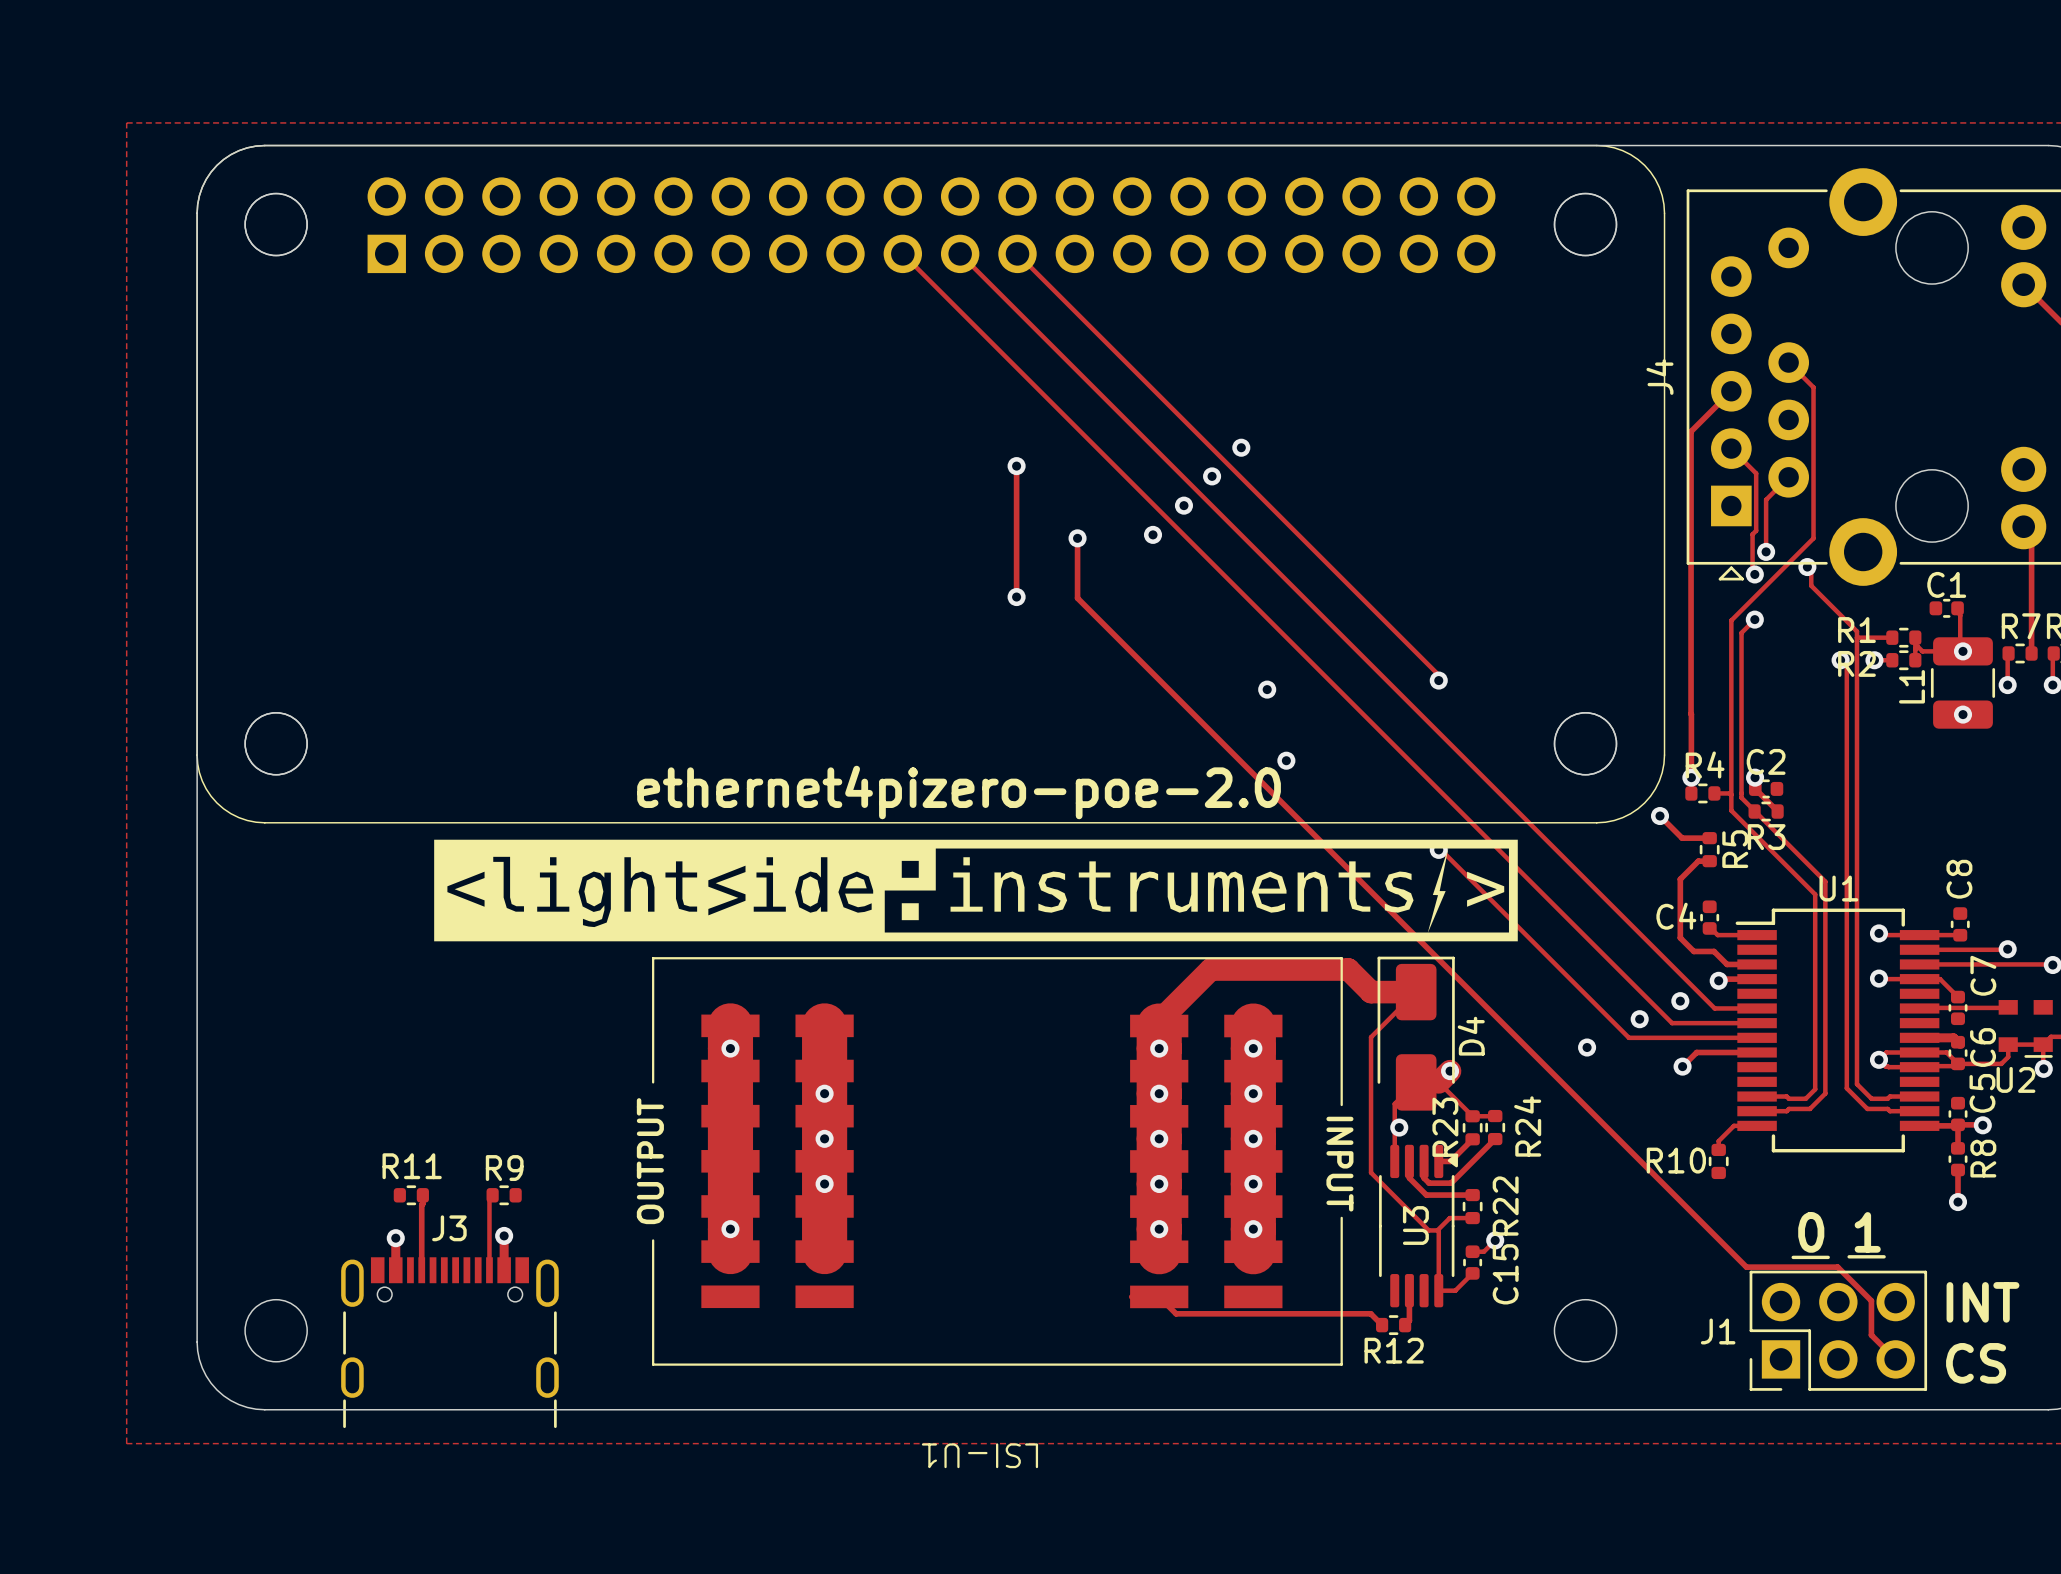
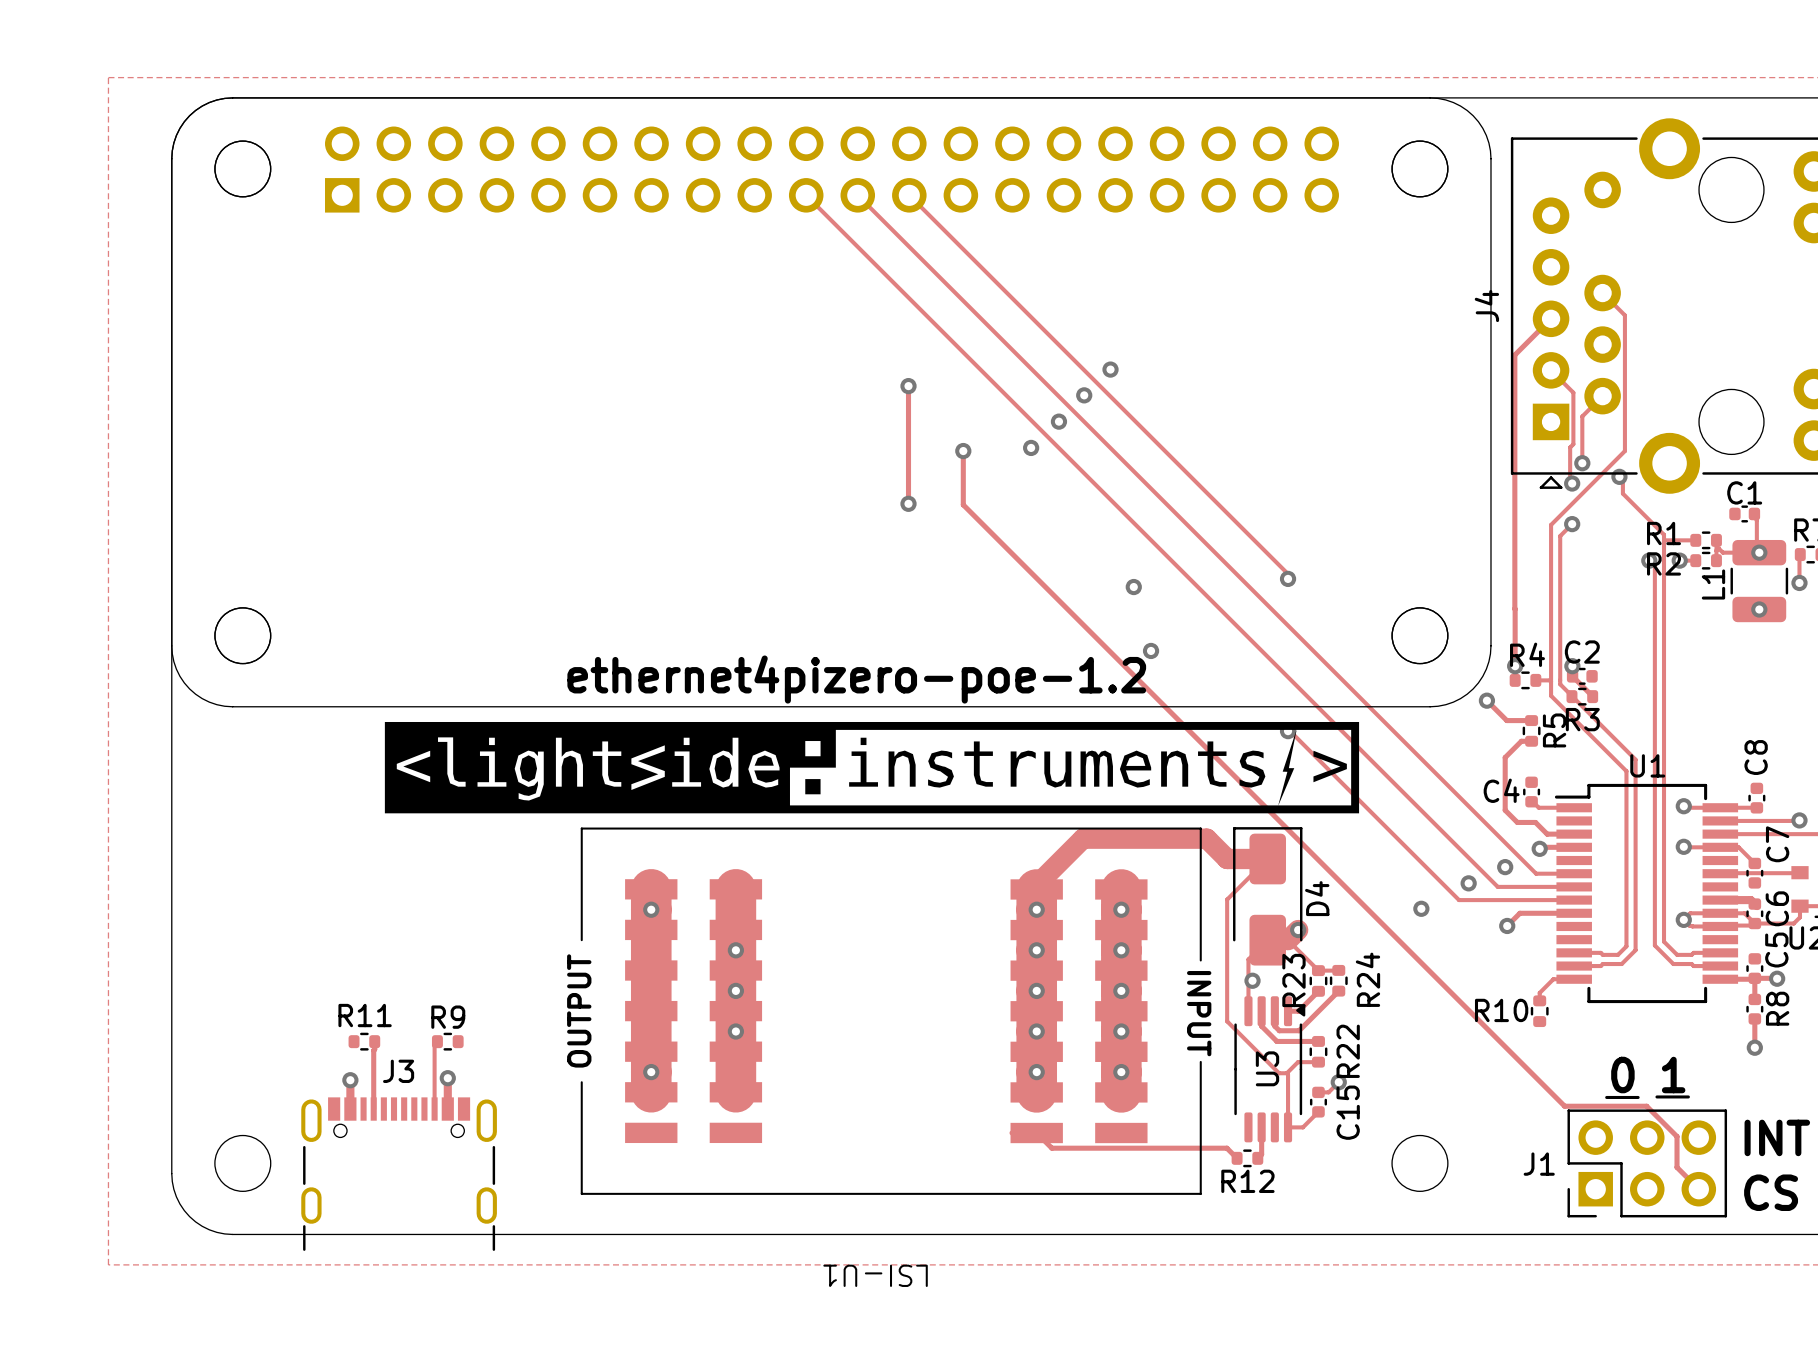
text: ethernet4pizero-poe-2.0 (959, 792) -> ethernet4pizero-poe-1.2 (856, 679)

